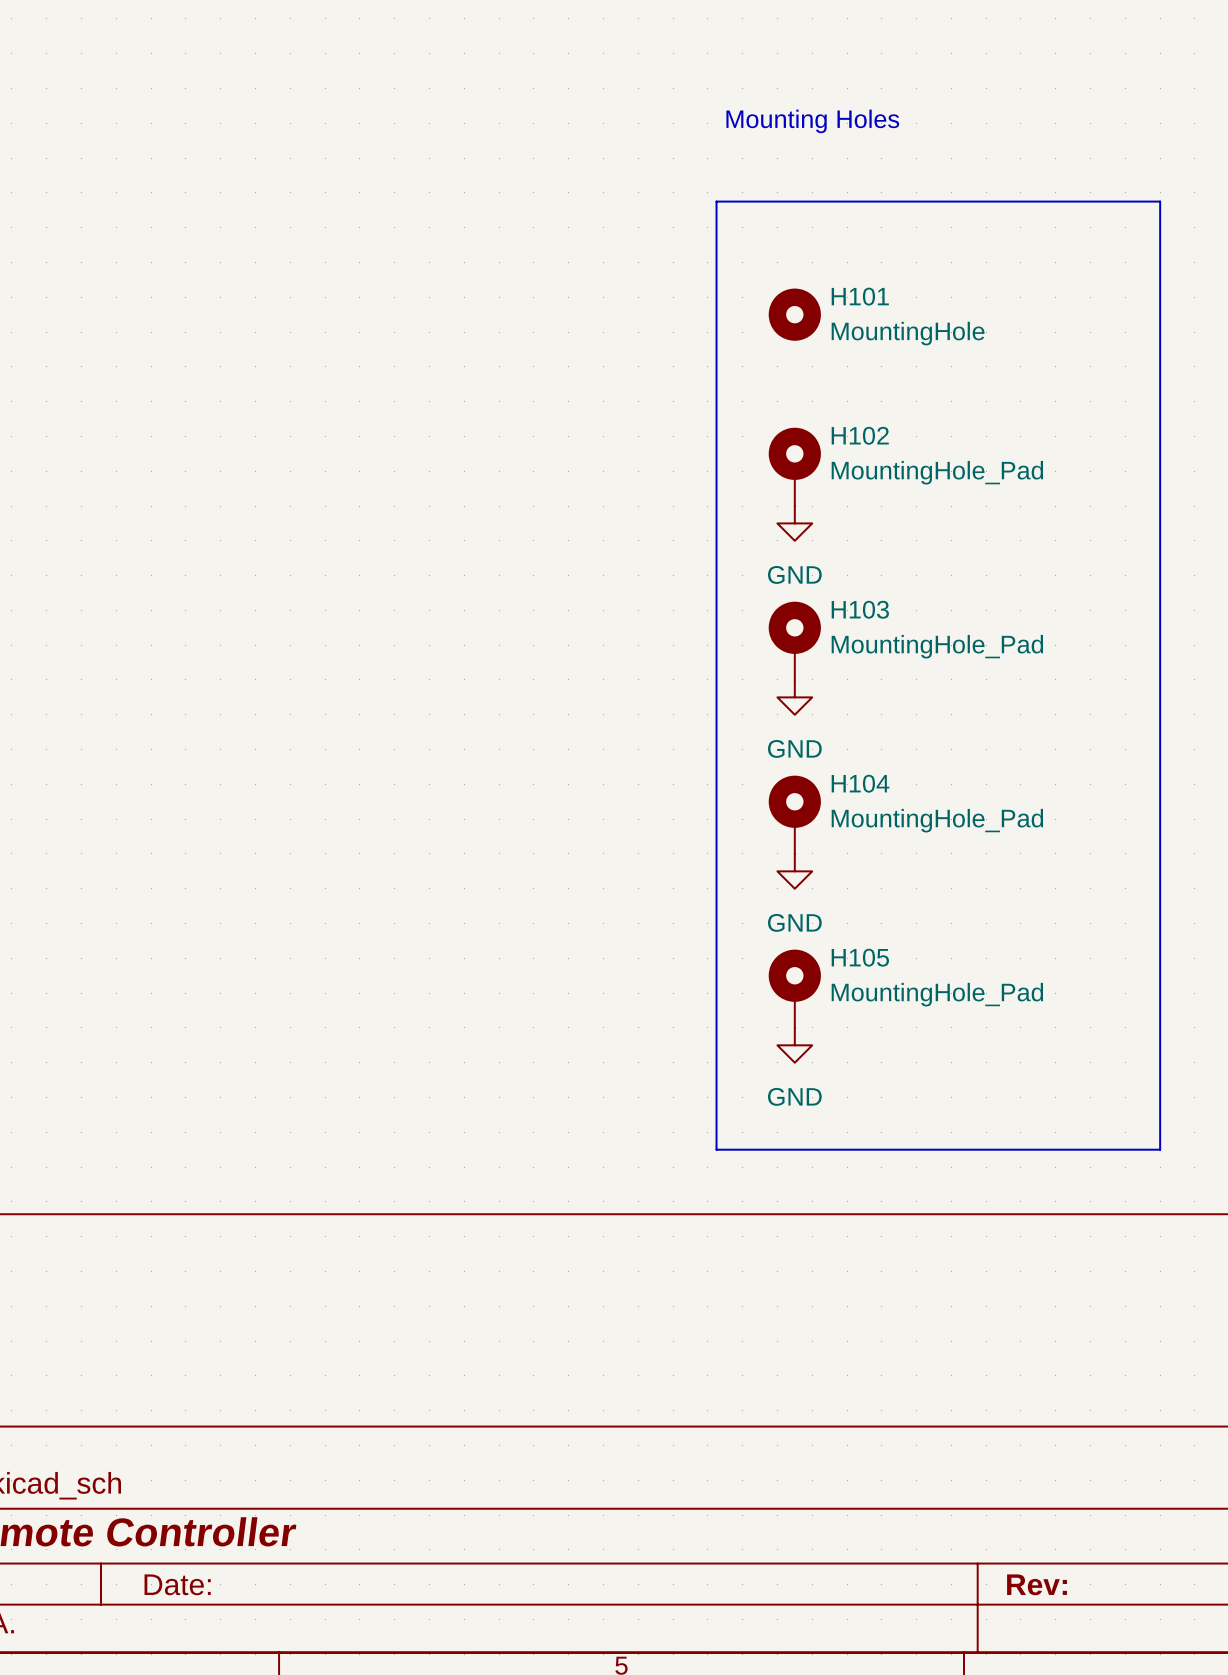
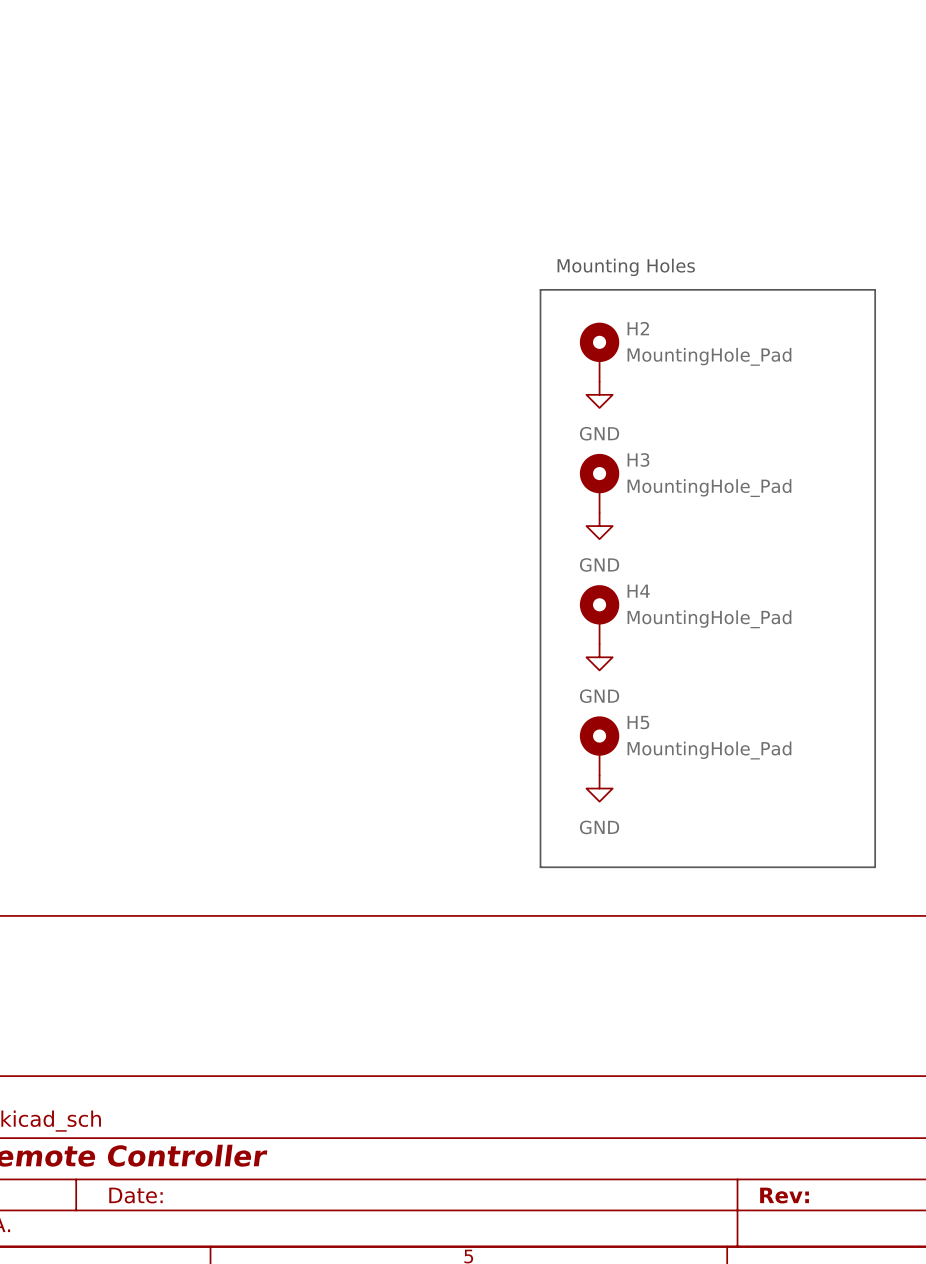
text position: Mounting Holes (812, 121) -> Mounting Holes (626, 267)
H101: MountingHole (794, 314) -> none
line: (716, 384) (716, 201) (1160, 201) (1160, 384) -> (540, 289) (875, 289)
H102 name: H102 (860, 435) -> H2 (638, 328)
H103 name: H103 (860, 609) -> H3 (638, 459)
H104 name: H104 (860, 783) -> H4 (638, 591)
H105 name: H105 (860, 957) -> H5 (638, 722)

